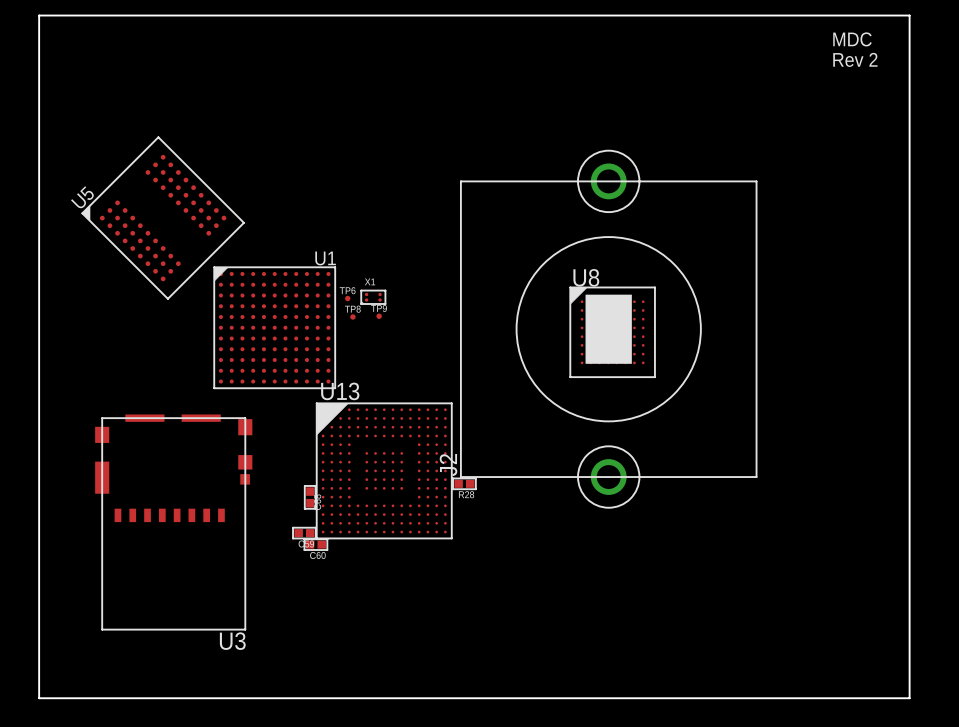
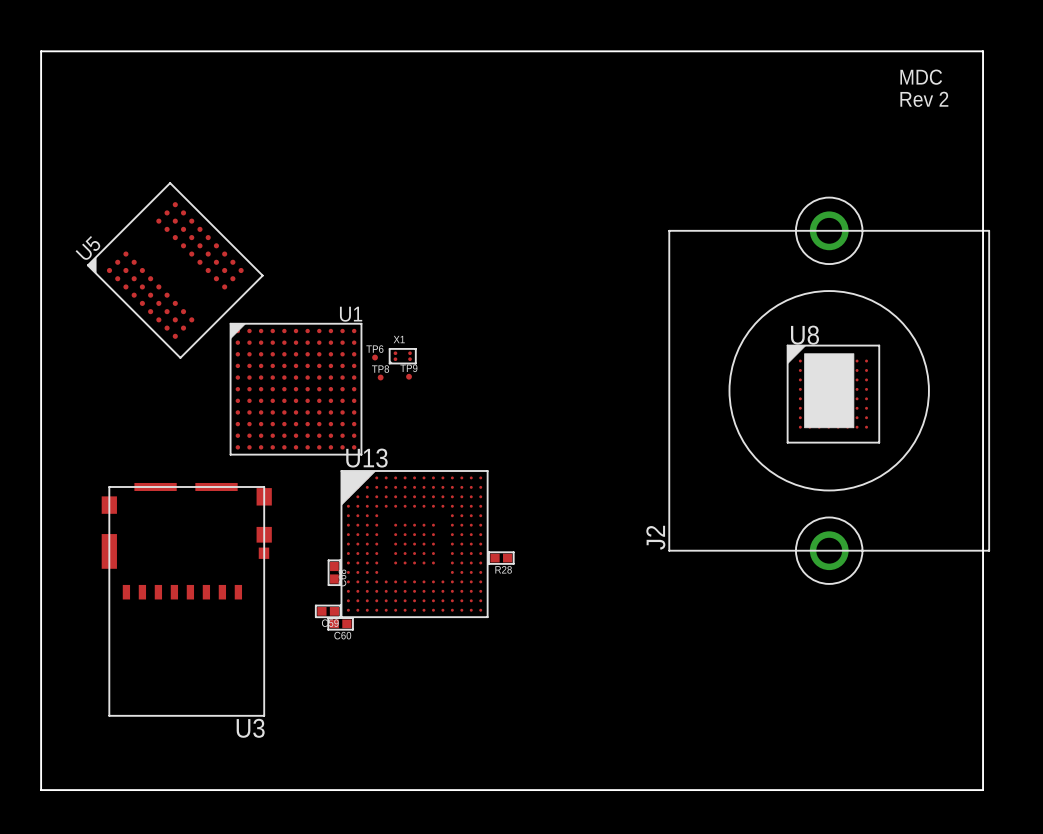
J2 position: (608, 329) -> (829, 390)
U8 position: (612, 332) -> (833, 394)

